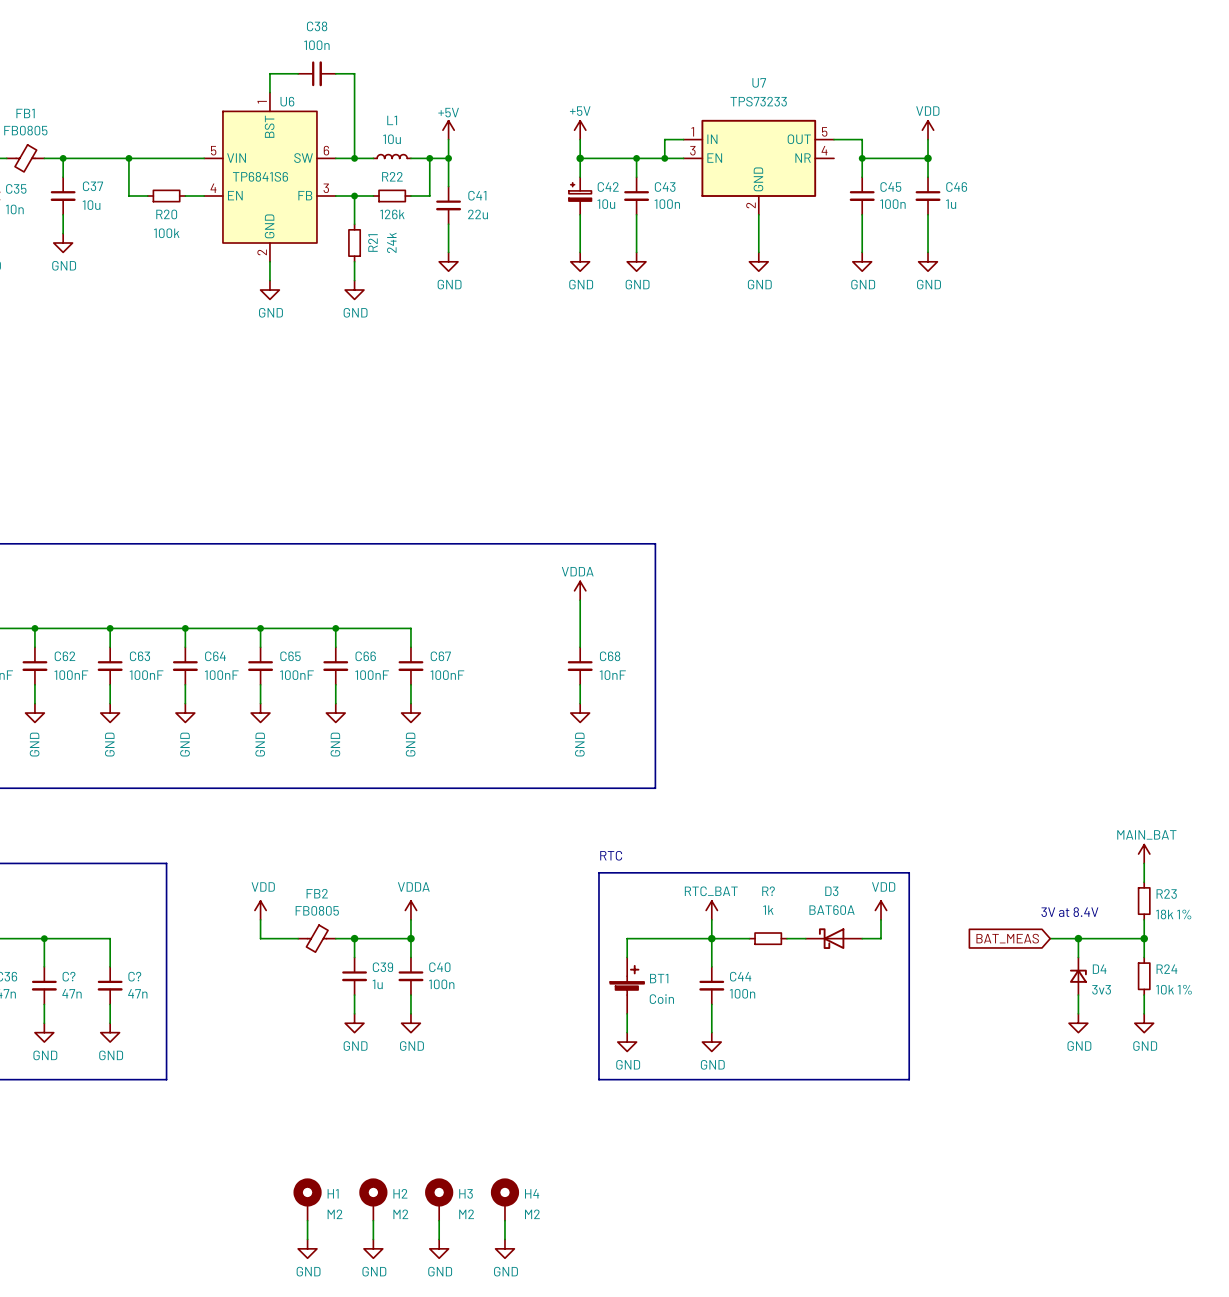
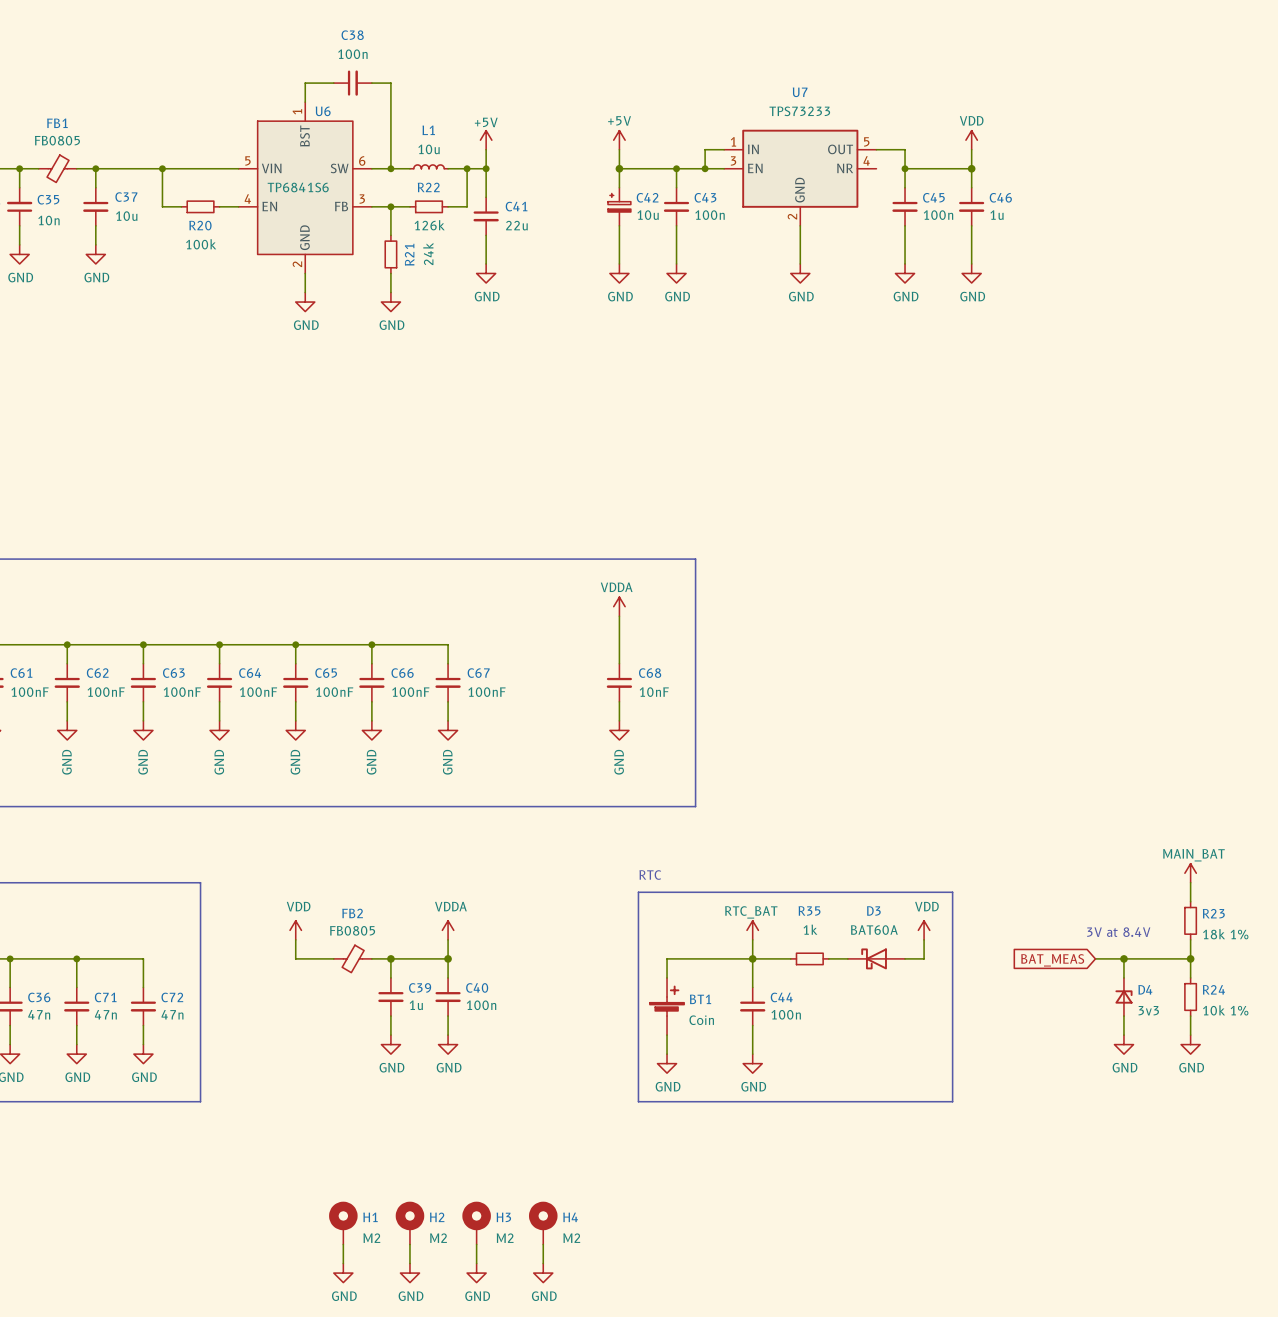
R? name: R? (768, 891) -> R35 (809, 910)
C? name: C? (69, 976) -> C71 (105, 997)
C? name: C? (134, 976) -> C72 (172, 997)

